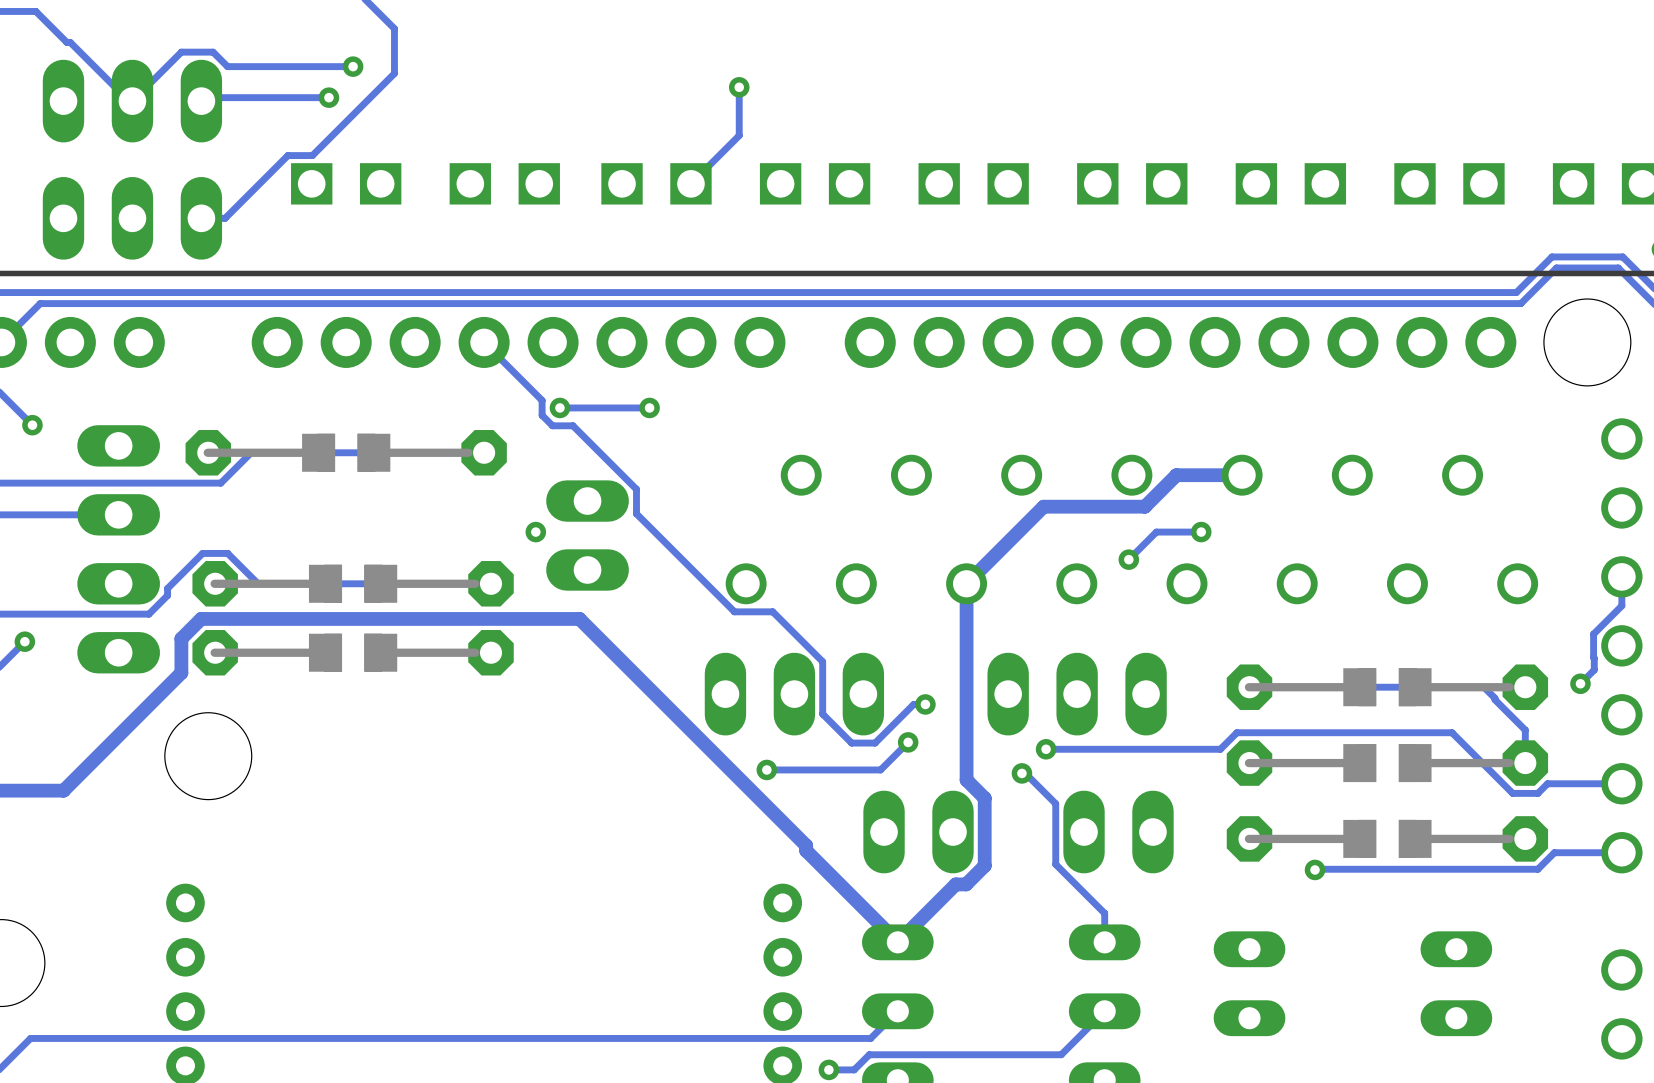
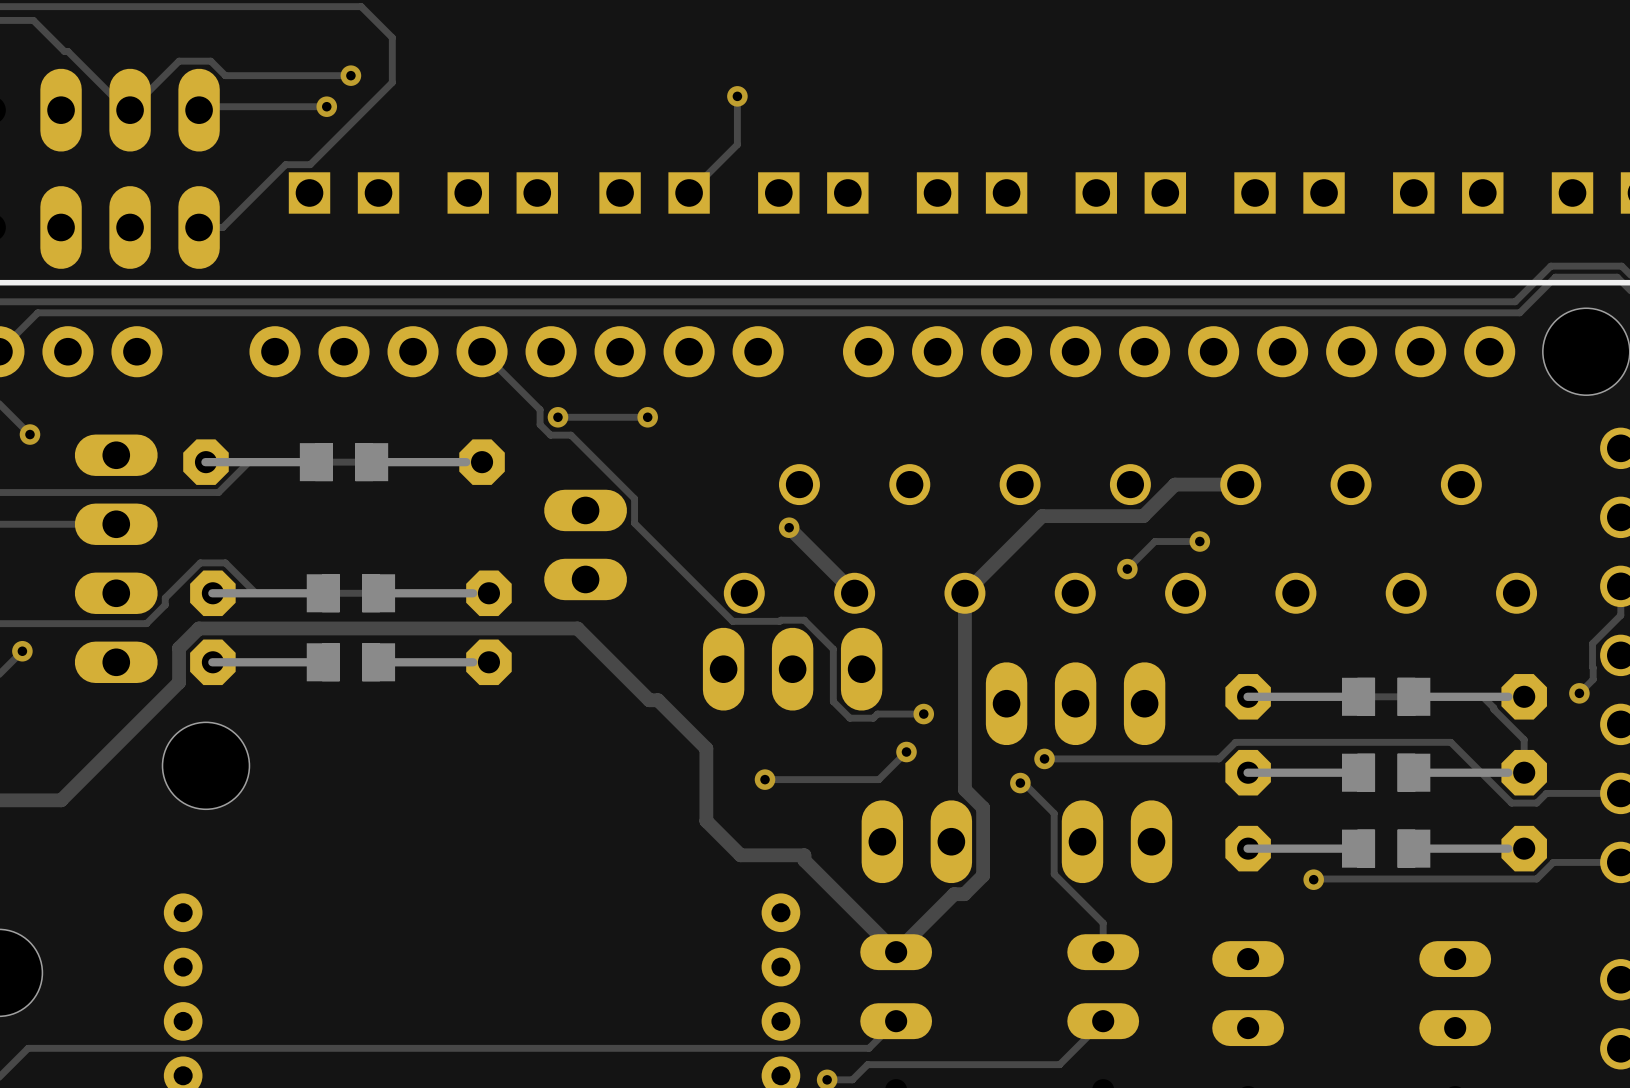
track: none -> (789, 527) (854, 593)
via: none -> (789, 527)
via: (535, 532) -> none
track: (772, 611) (822, 661) (822, 714) (851, 743) (875, 743) (913, 704) -> (771, 621) (804, 620) (833, 649) (833, 701) (849, 718) (873, 718) (877, 714) (912, 714)
track: (651, 690) (806, 845) -> (649, 700) (658, 700) (706, 748) (706, 821) (740, 855) (804, 855)
part position: (794, 694) -> (792, 669)

